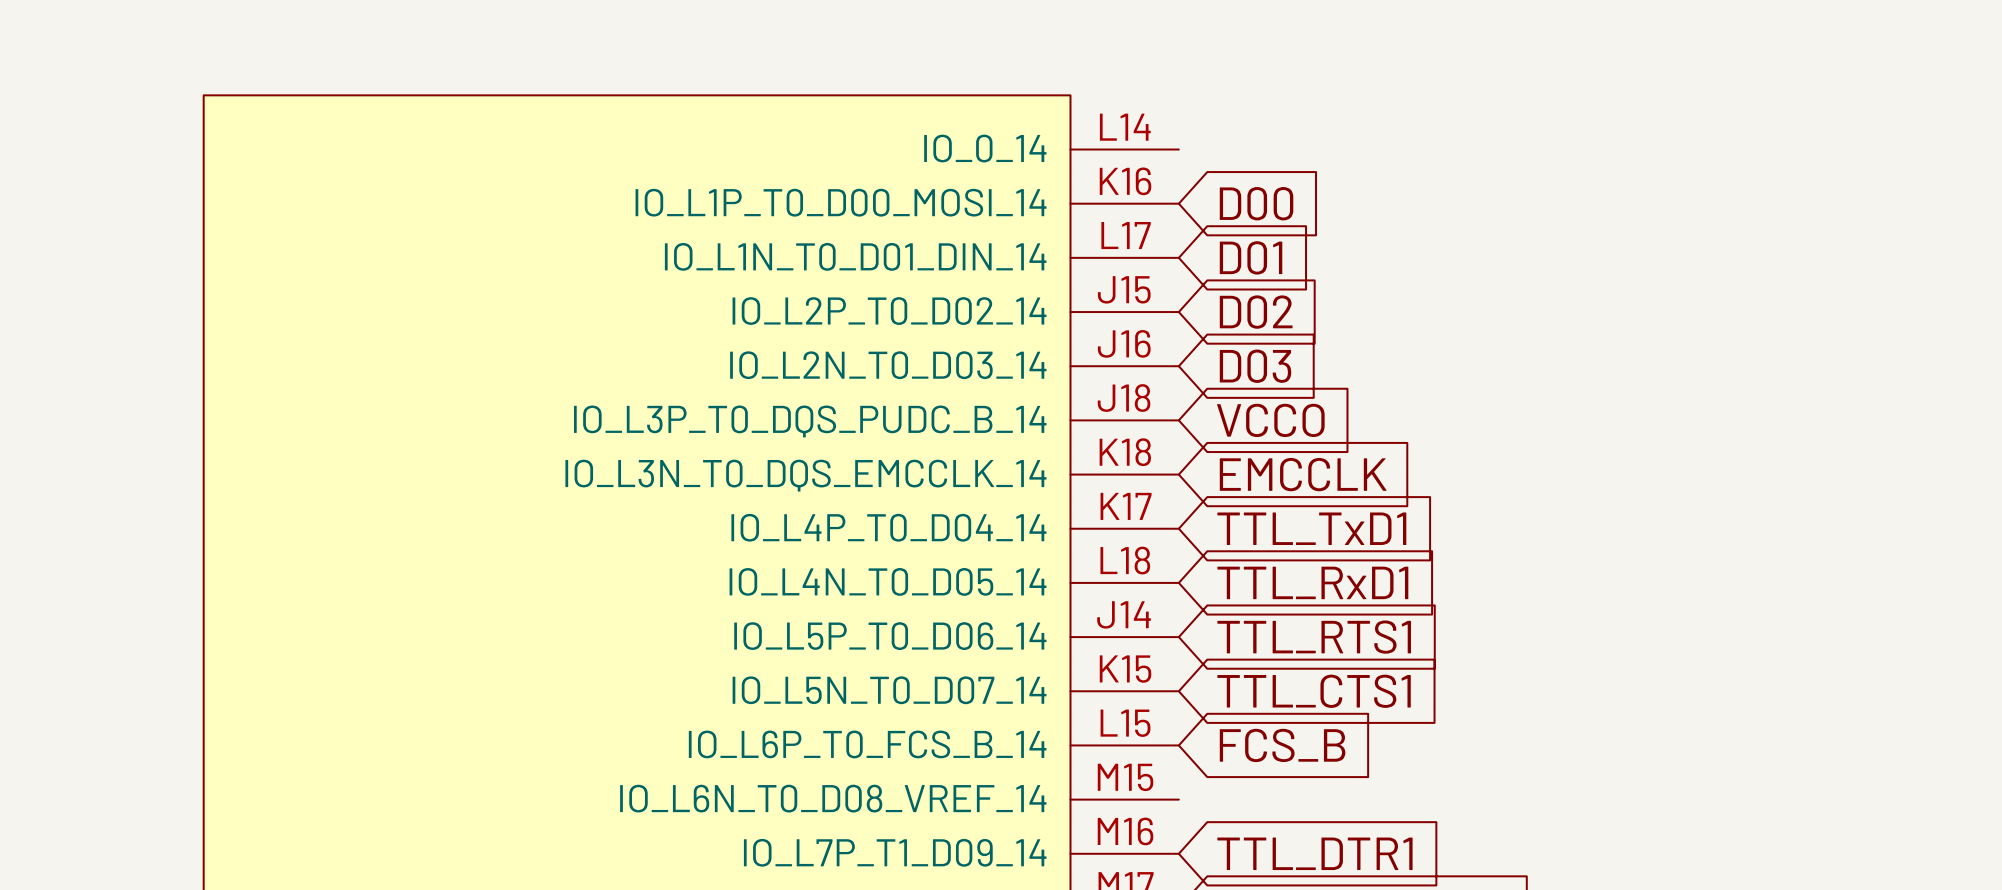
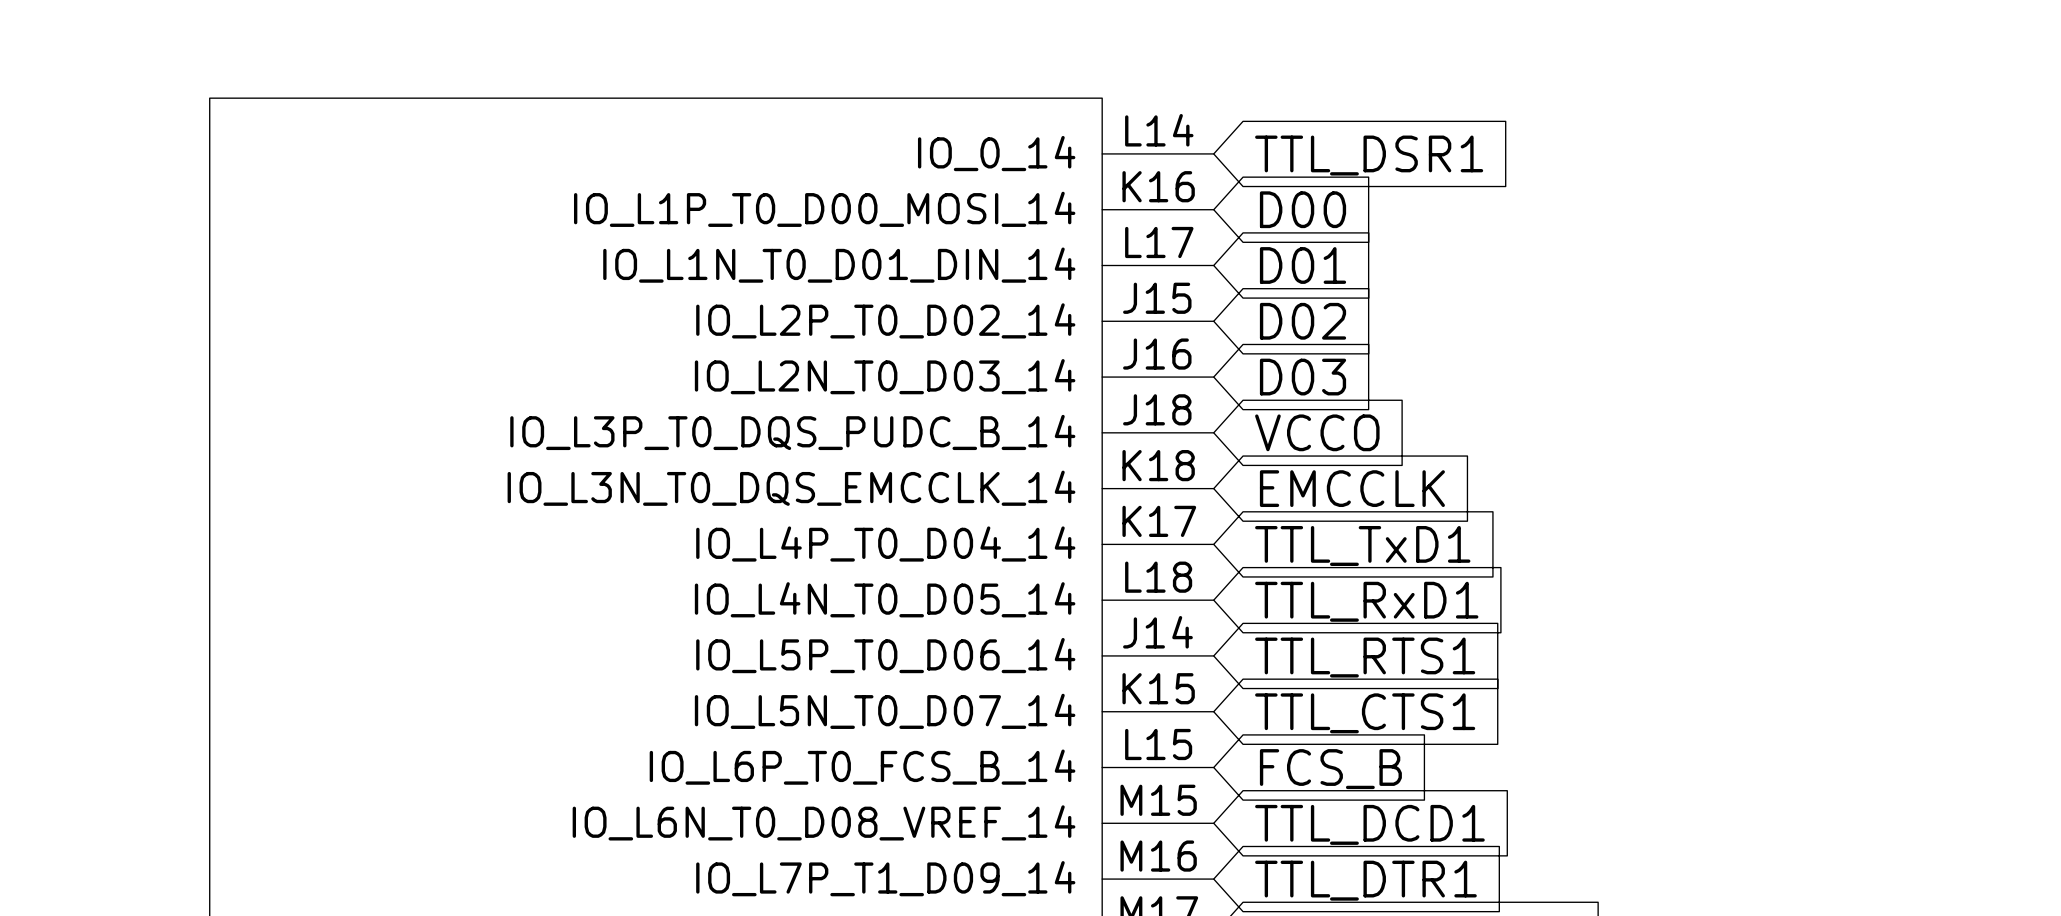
global label: none -> TTL_DSR1 (1369, 155)
global label: none -> TTL_DCD1 (1369, 824)

